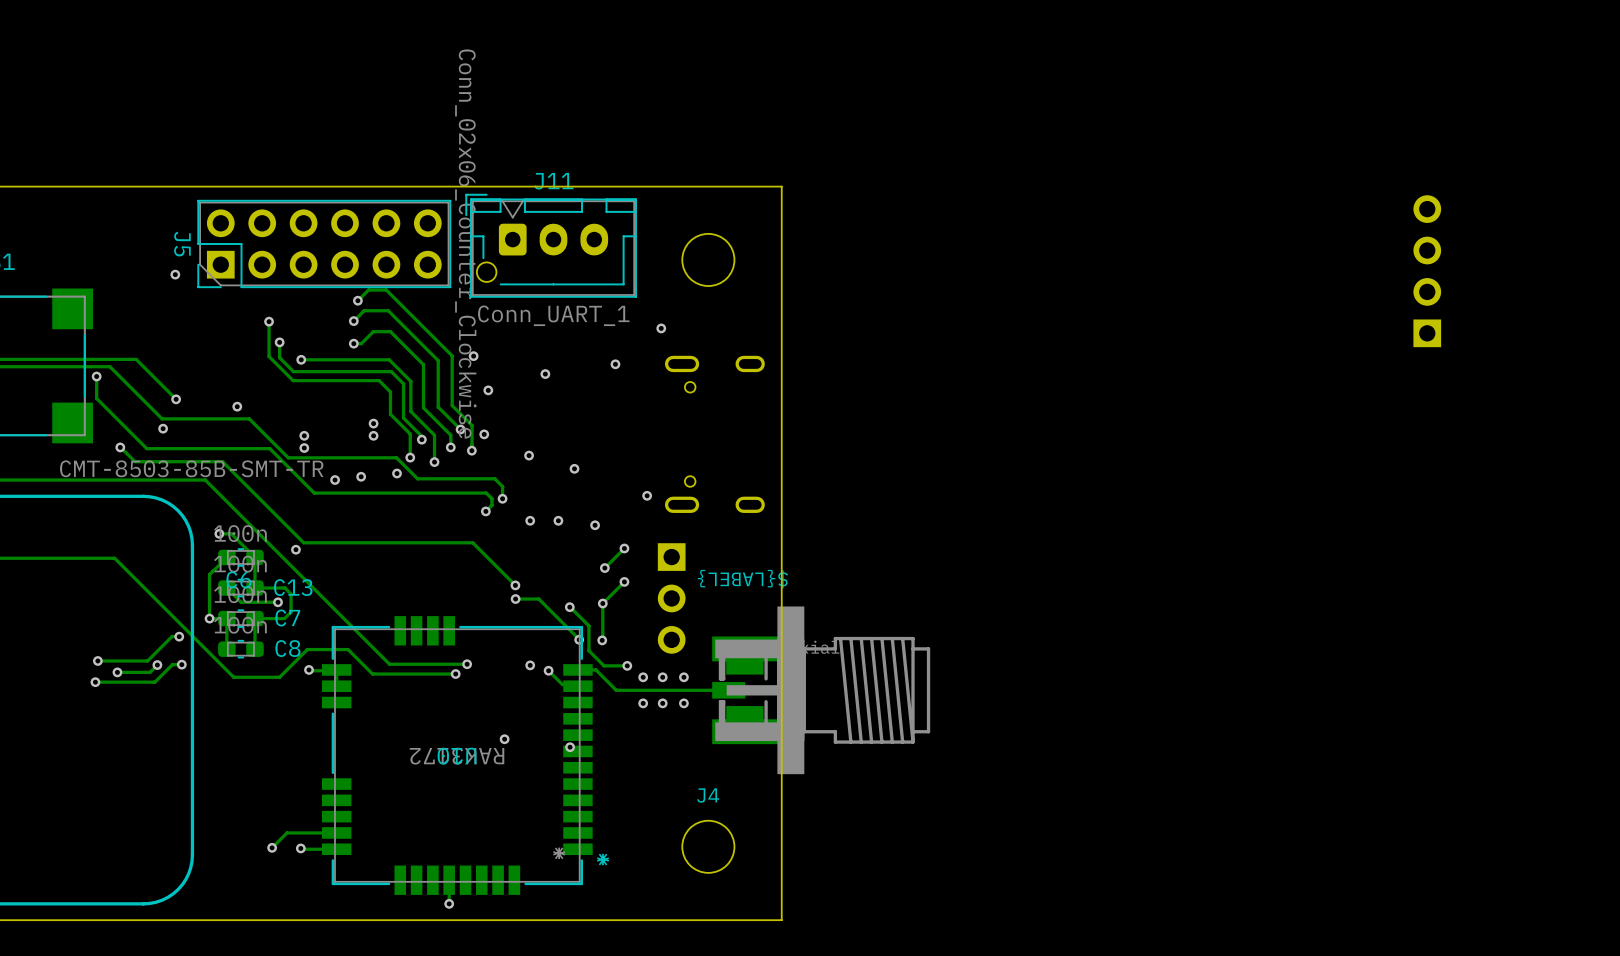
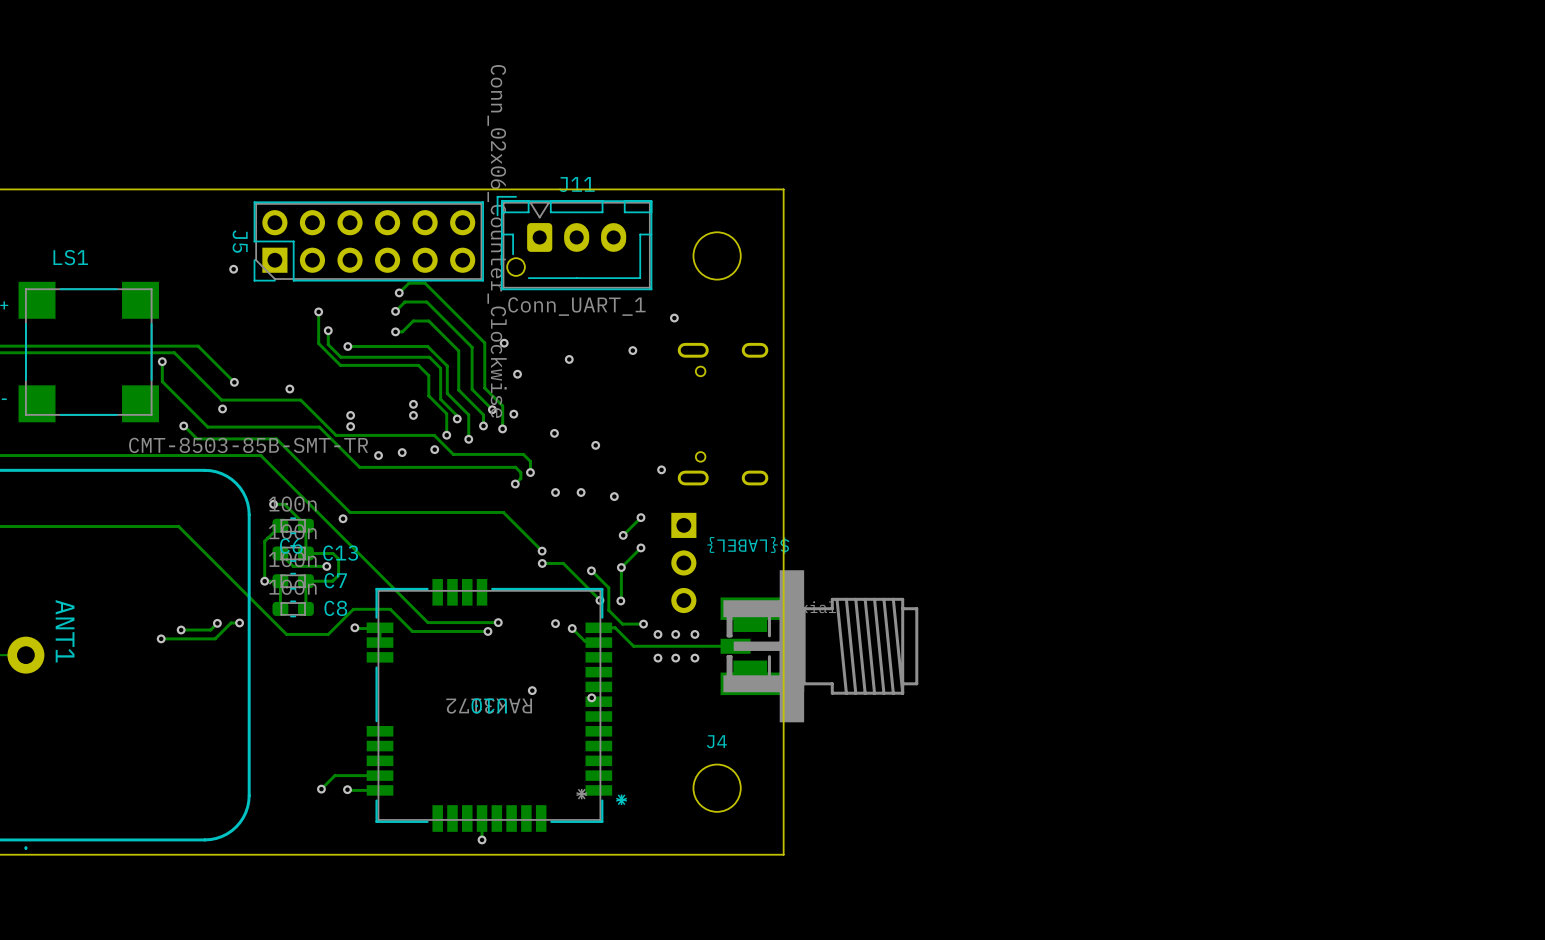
part: (1427, 271) -> none
track: (179, 636) (172, 636) (147, 660) (97, 660) -> none
via: (179, 636) -> none
via: (97, 660) -> none

